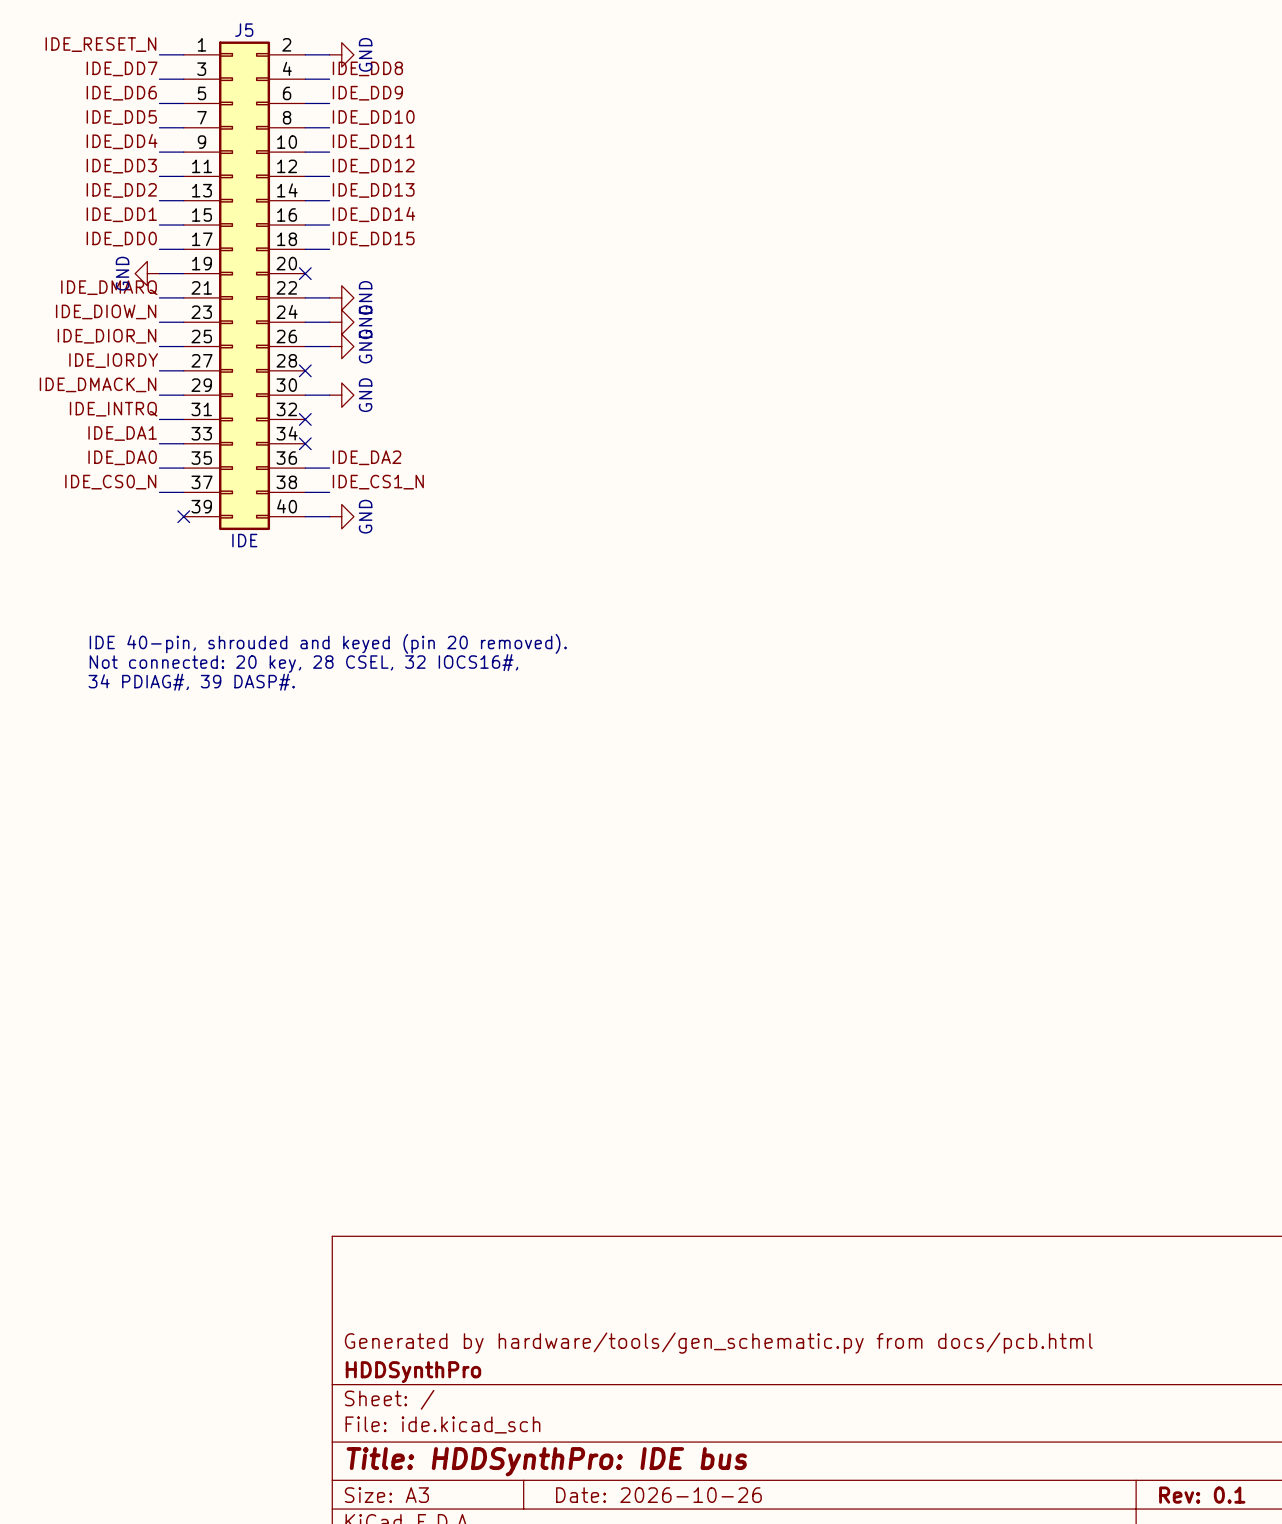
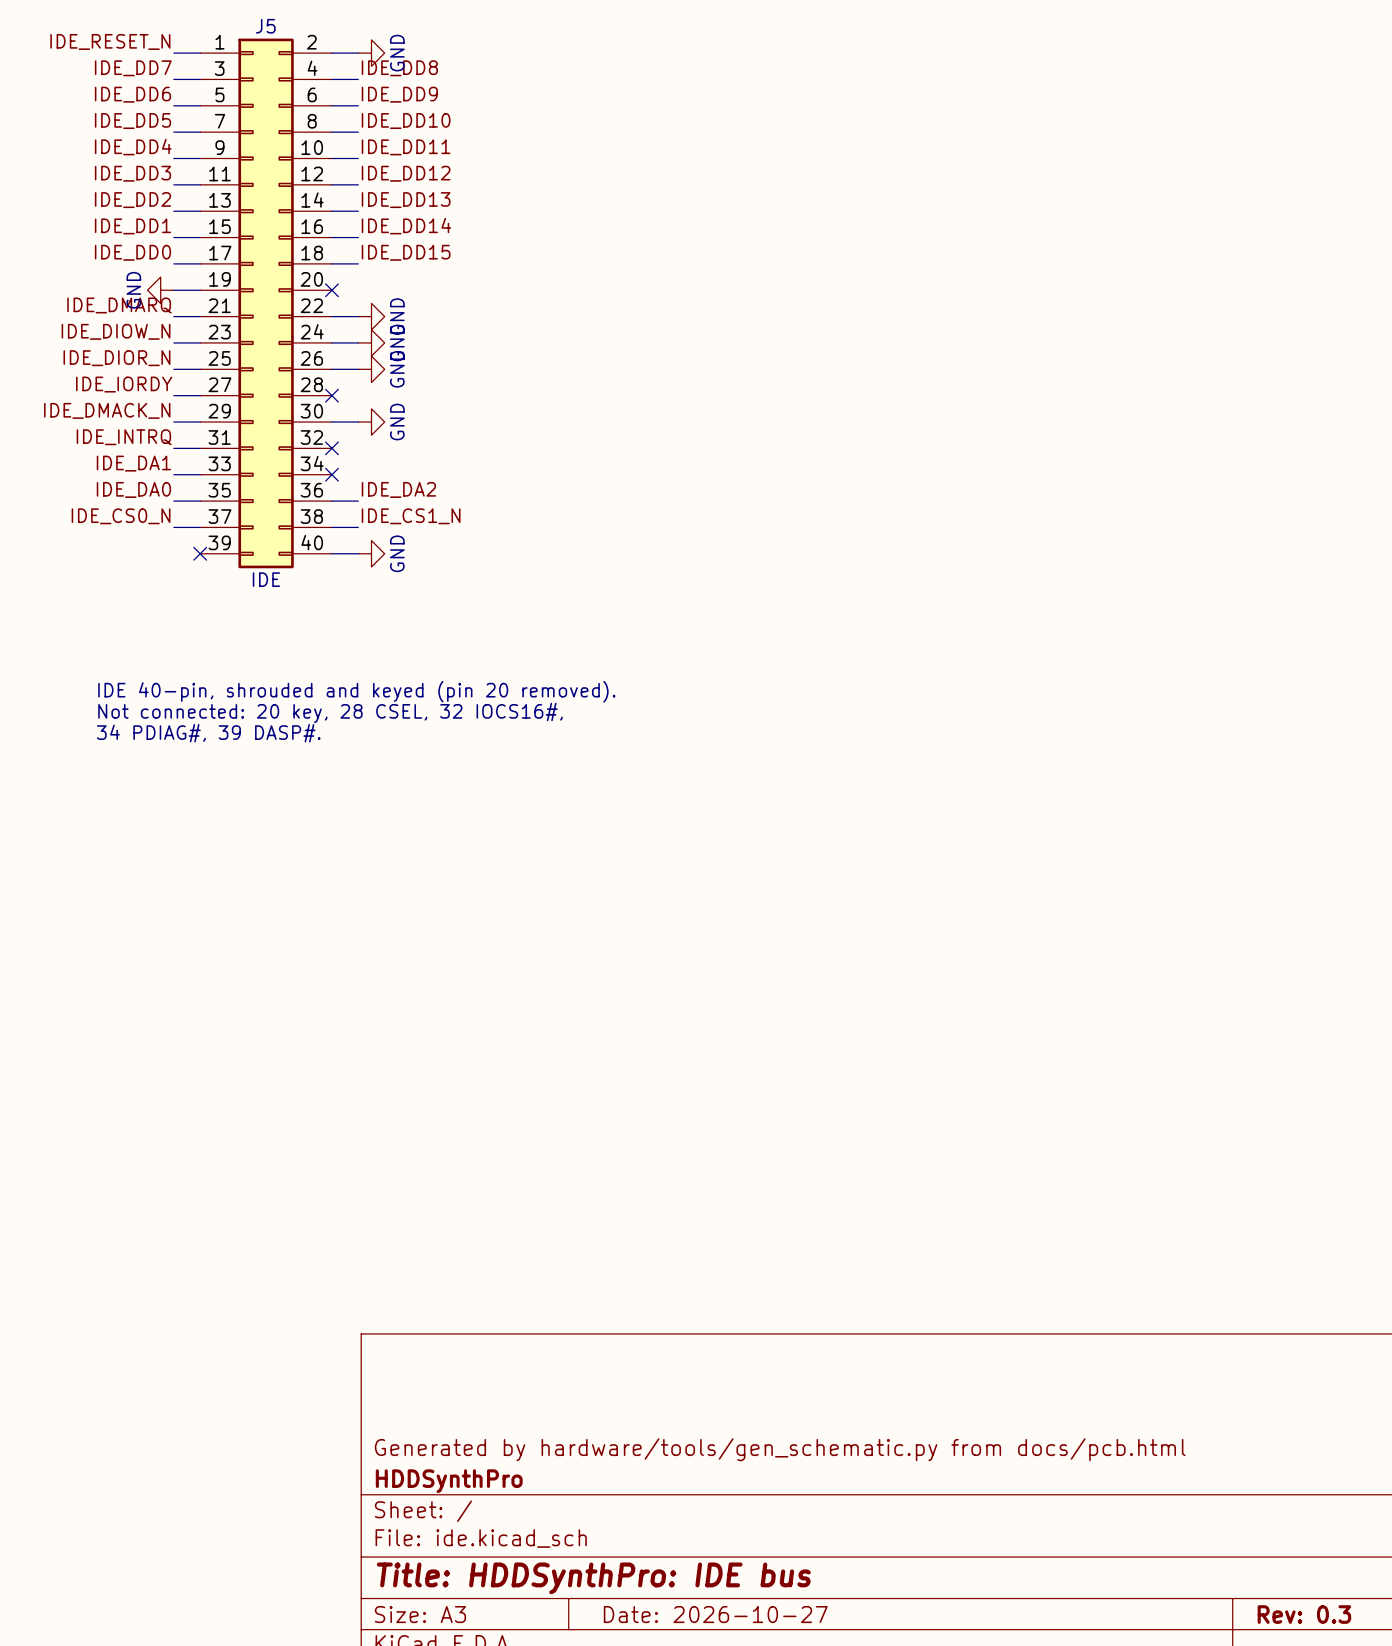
title block: Date: 2026-10-26 (658, 1495) -> Date: 2026-10-27 (715, 1614)
title block: Rev: 0.1 (1202, 1495) -> Rev: 0.3 (1304, 1614)

